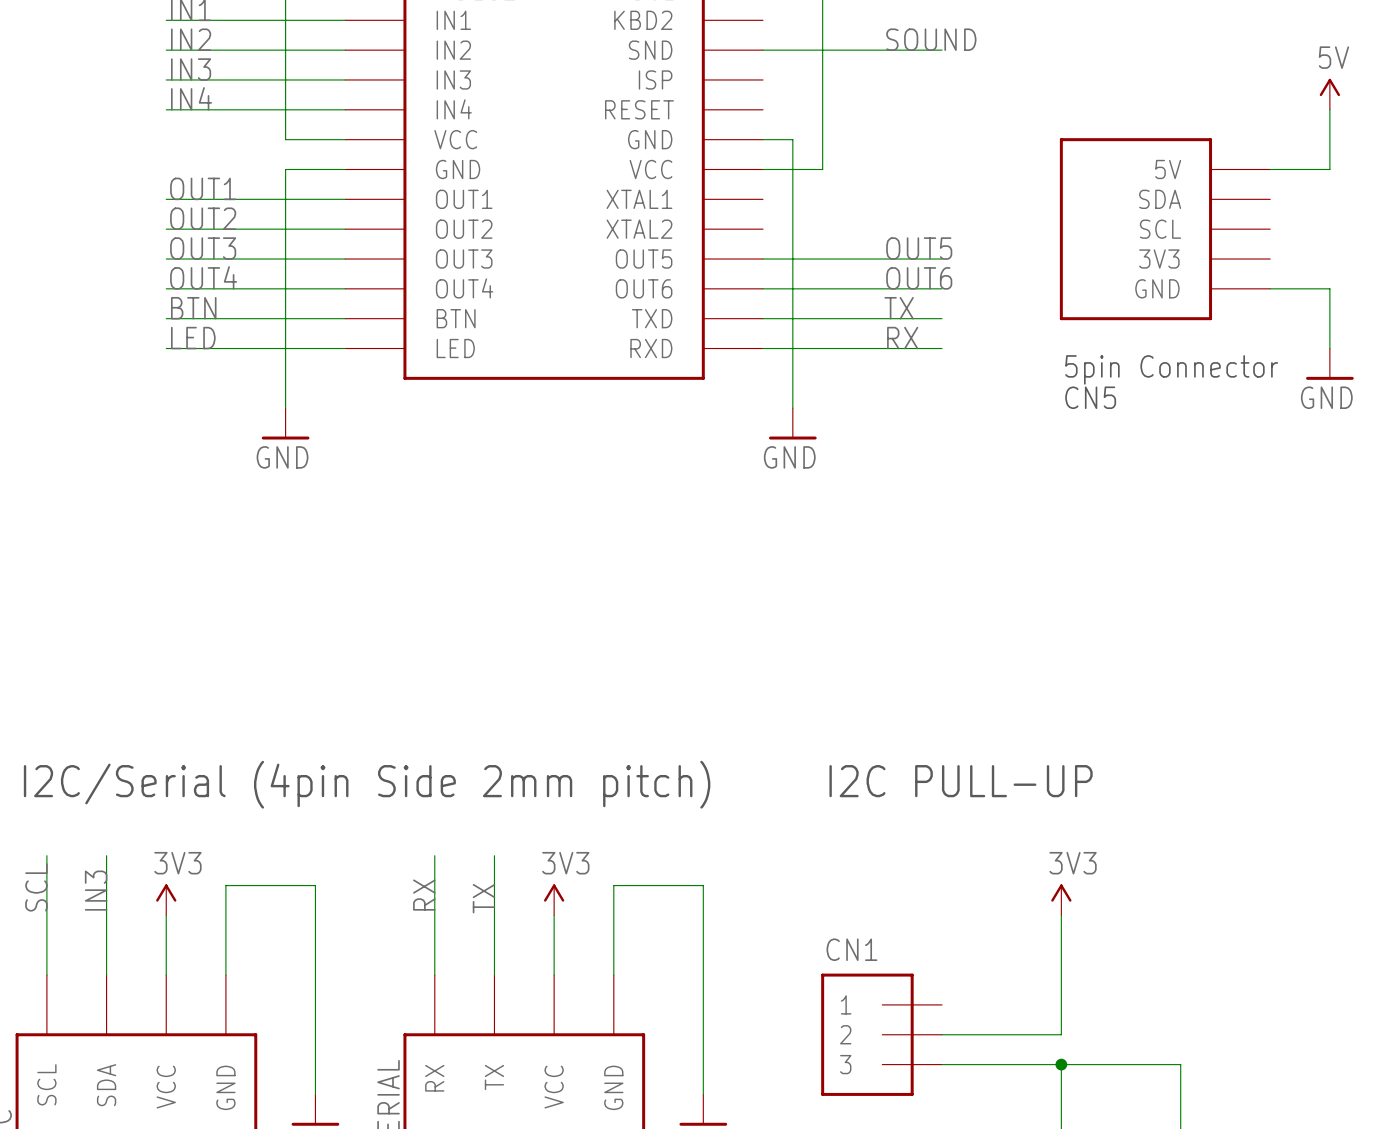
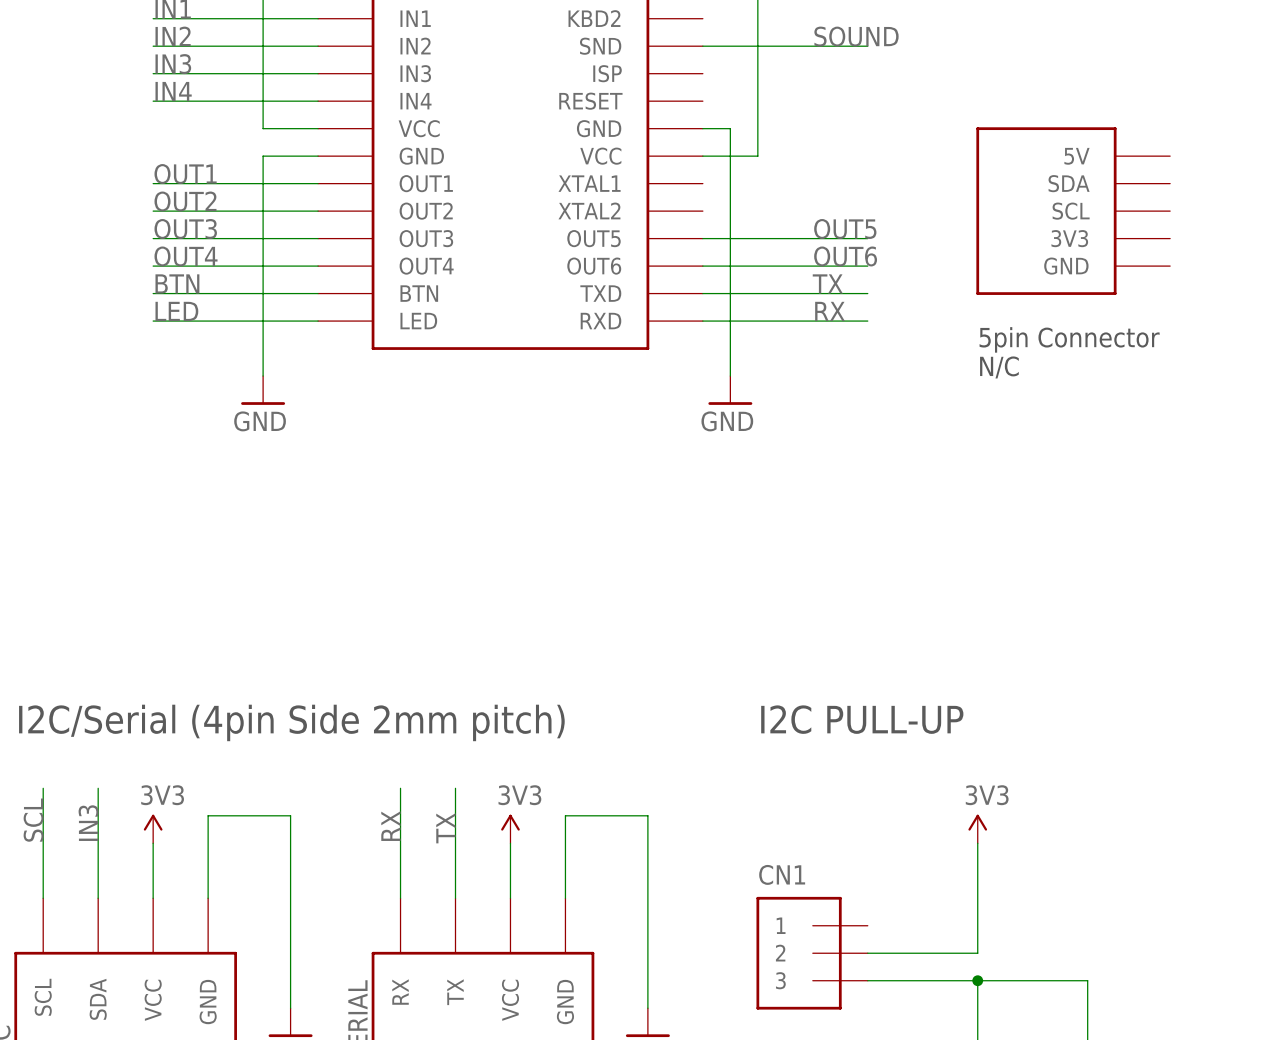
power symbol: 5V (1329, 94) -> none
wire: (1329, 109) (1329, 169) (1270, 169) -> none
wire: (1270, 288) (1329, 288) (1329, 348) -> none
power symbol: GND (1329, 364) -> none
text: CN5 (1090, 397) -> N/C (999, 367)

